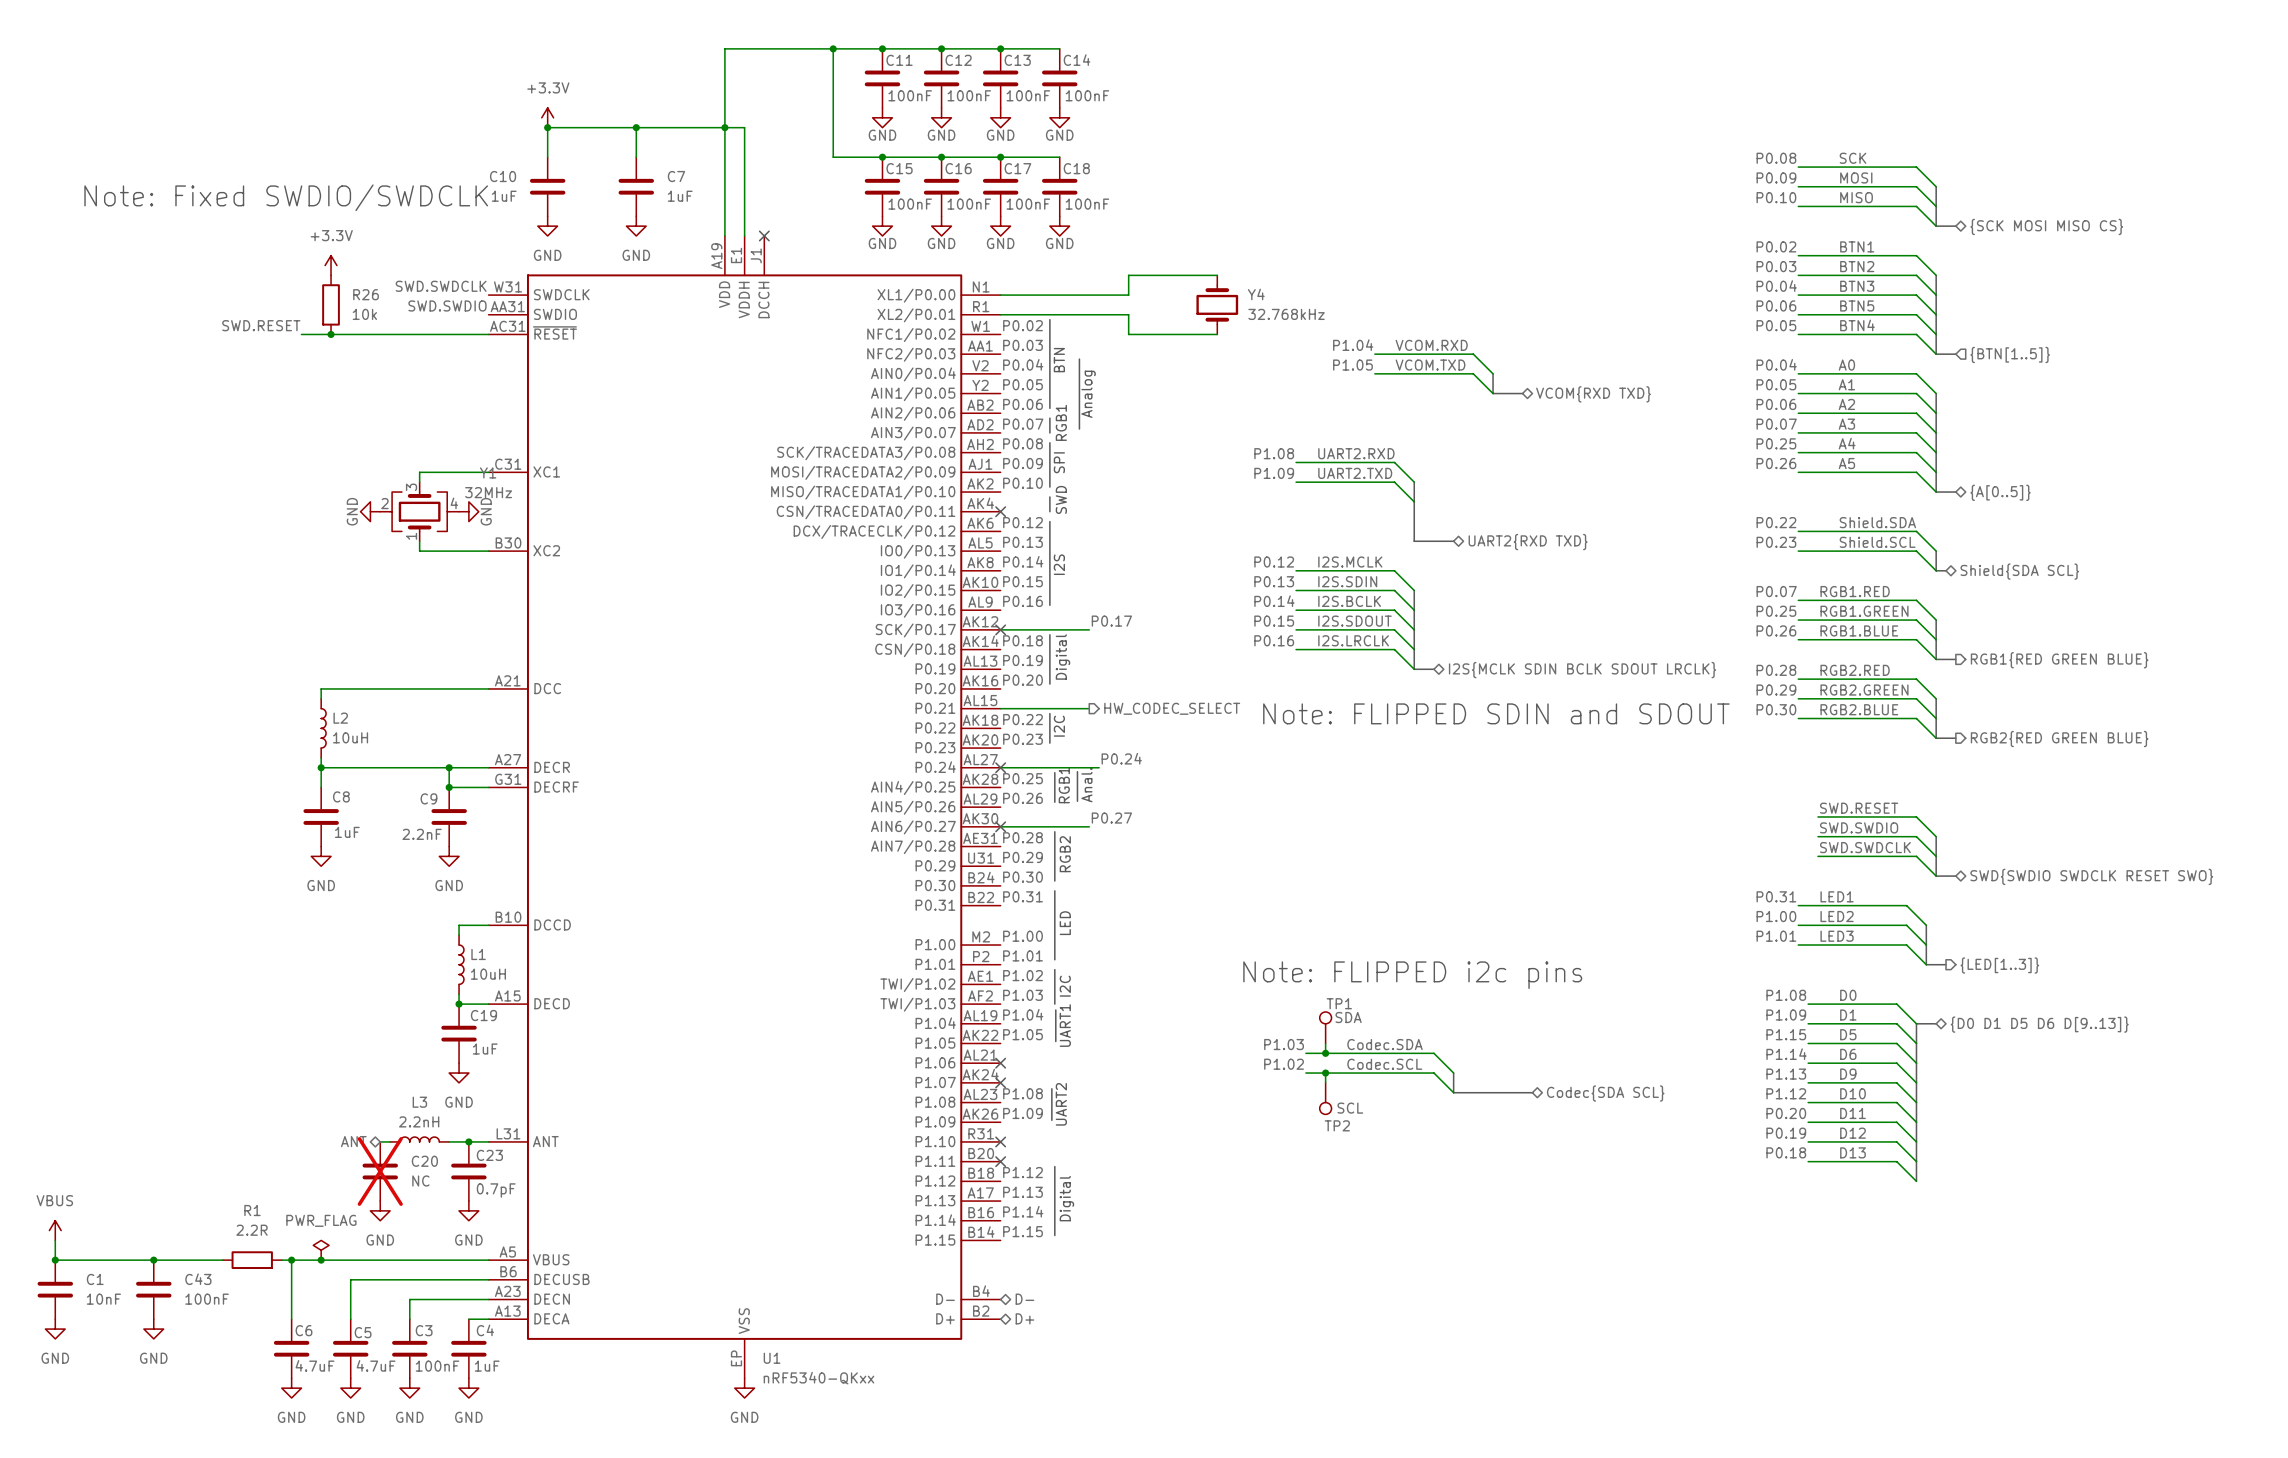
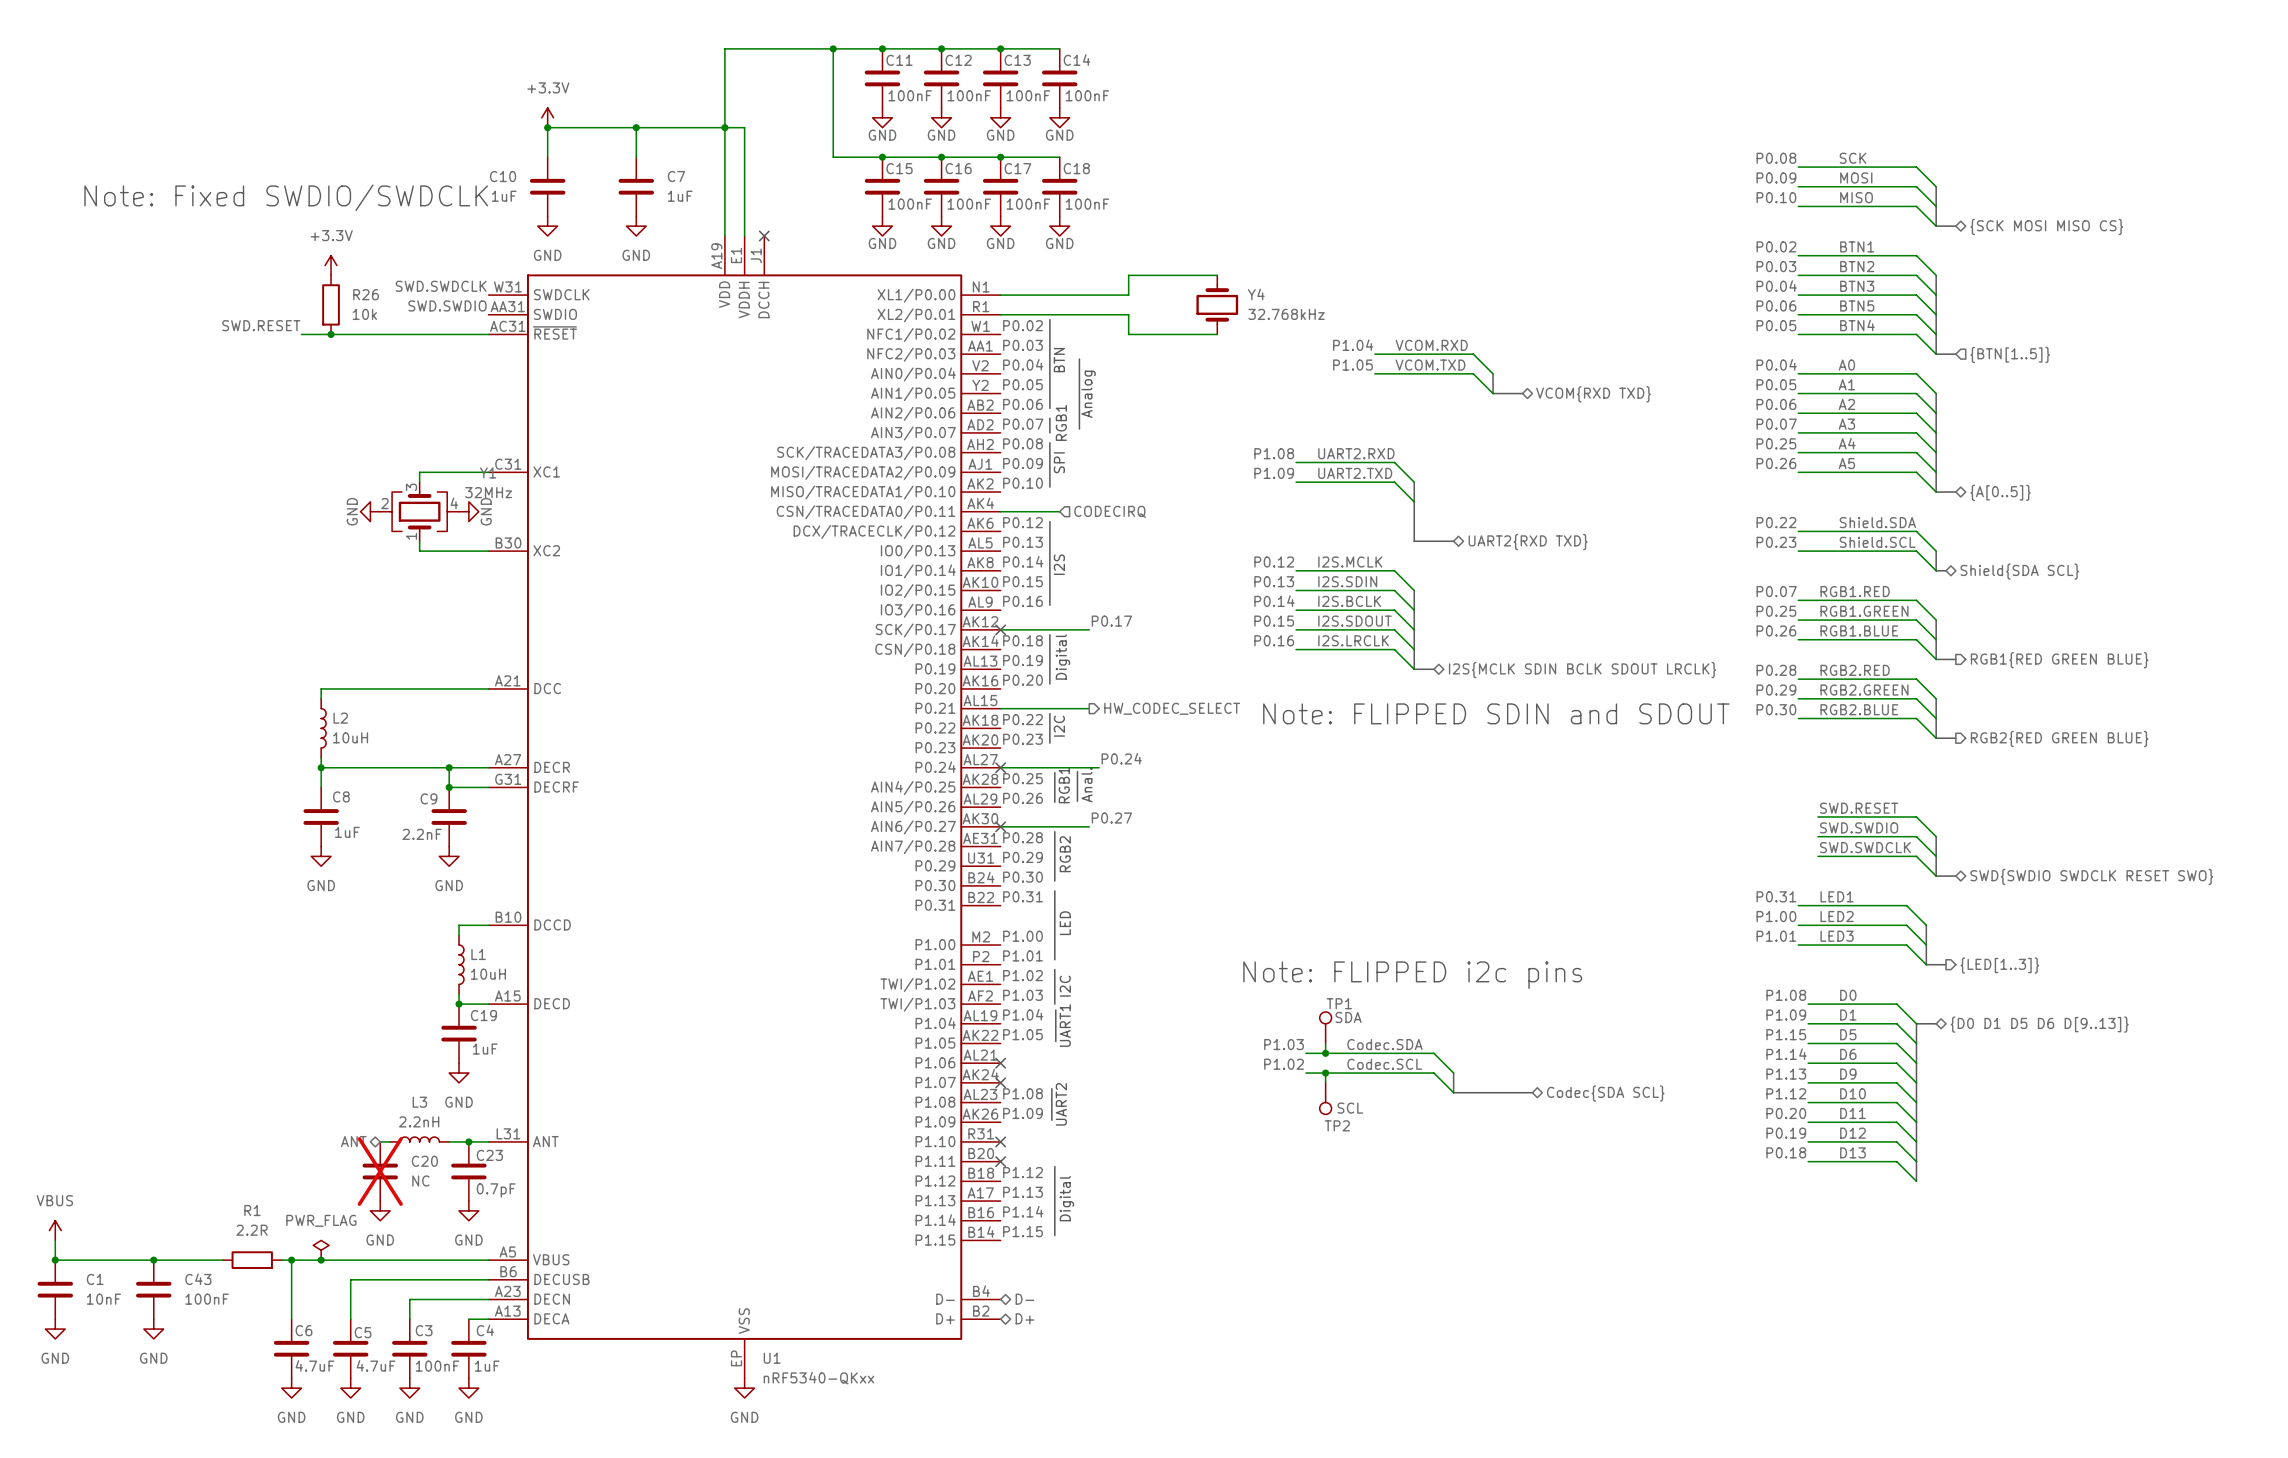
line: (1049, 496) (1049, 511) -> none
text: SWD (1061, 499) -> none
wire: none -> (1000, 511) (1059, 511)
no-connect mark: (1000, 511) -> none
hierarchical label: none -> CODECIRQ (1110, 511)

